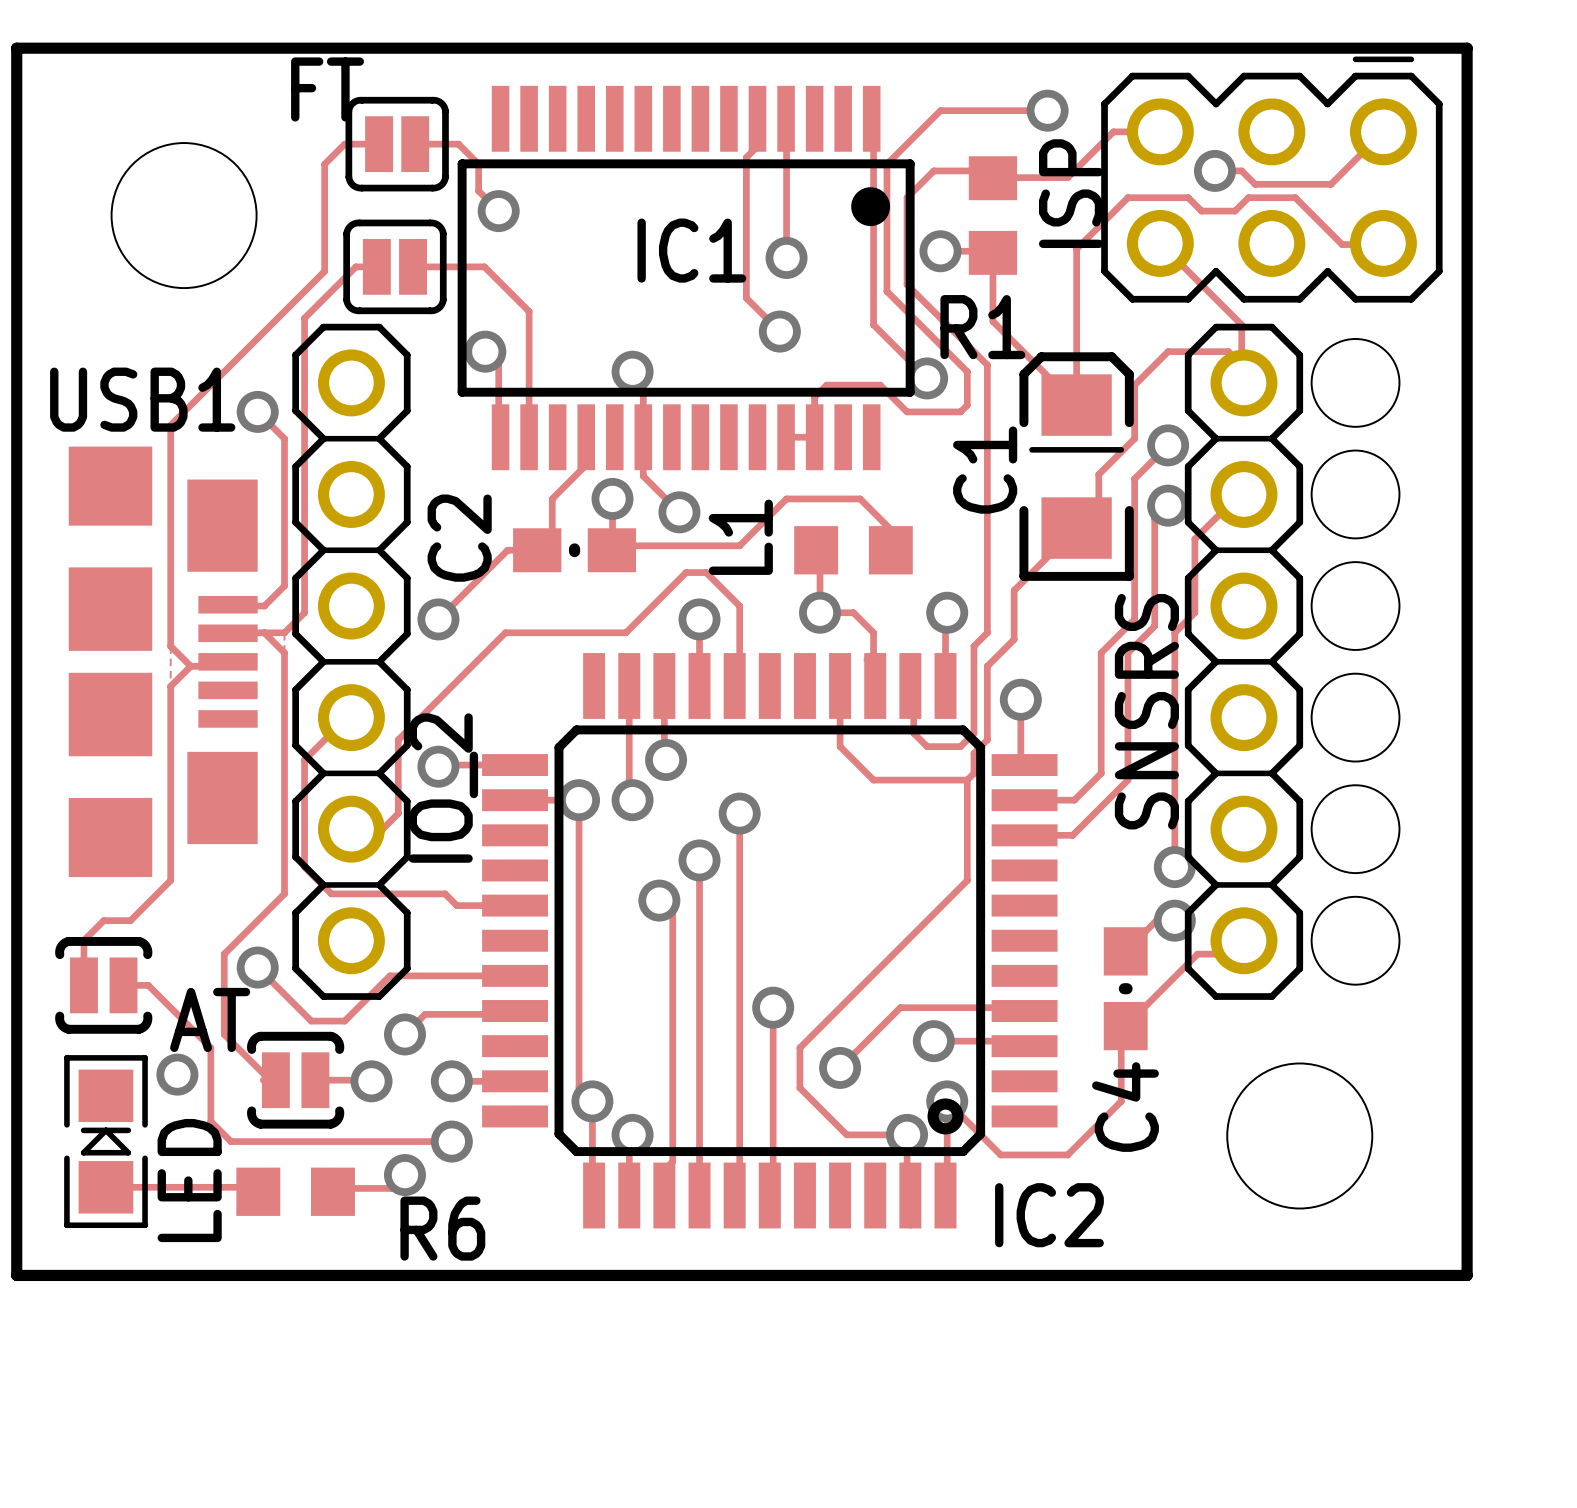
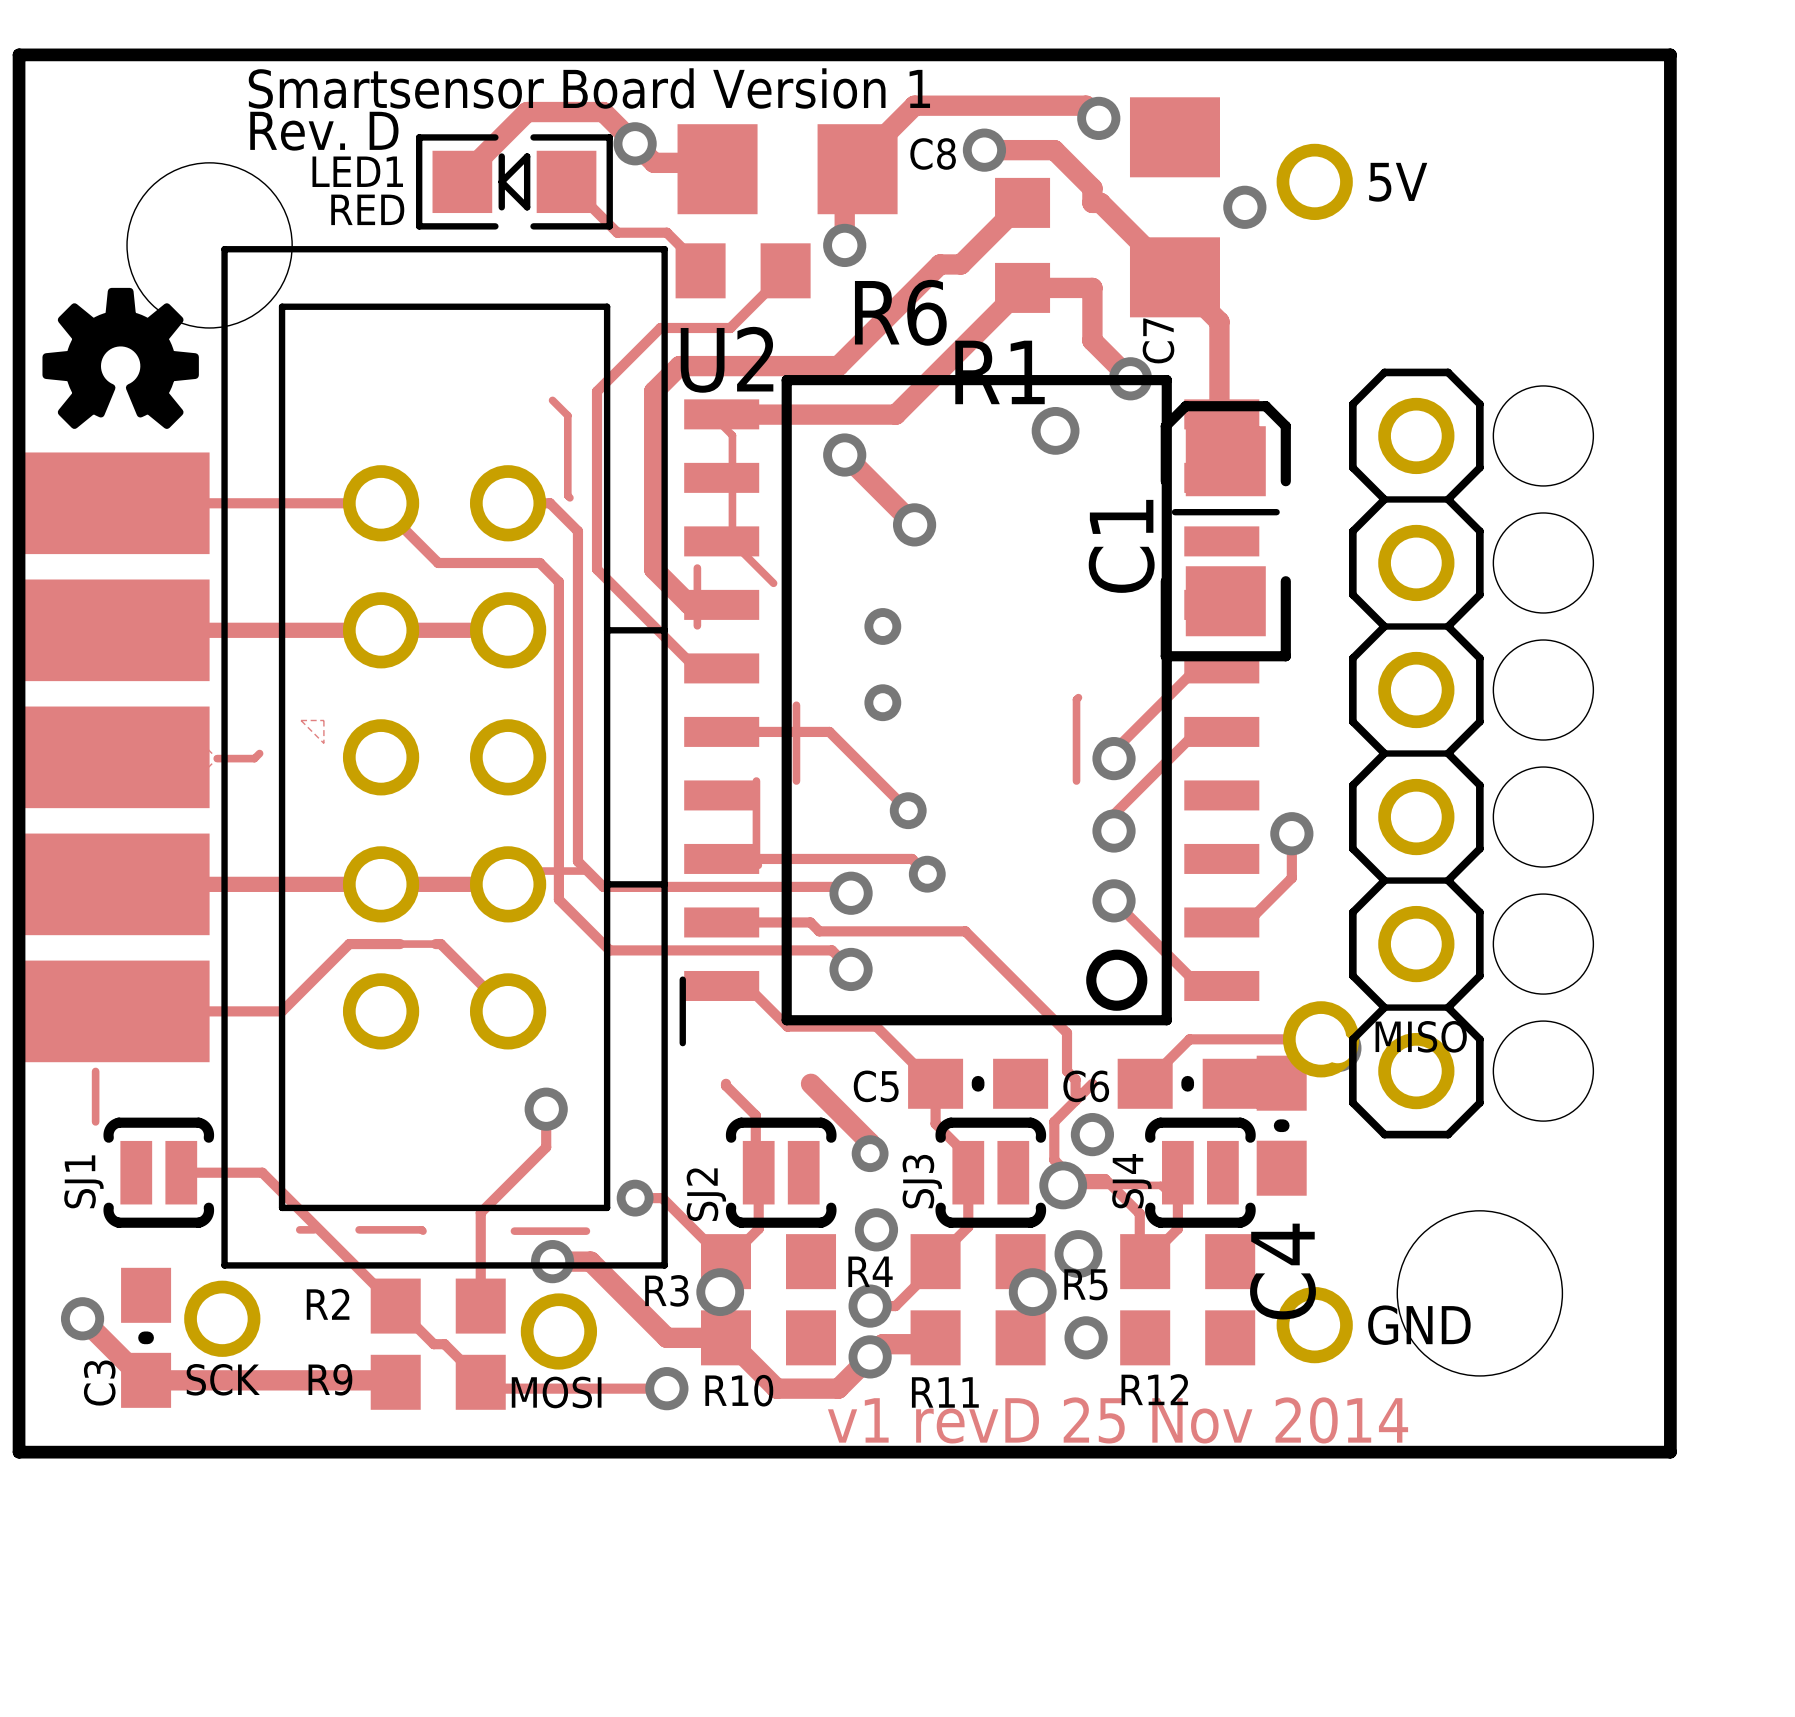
text: none -> Smartsensor Board Version 1 (589, 88)
text: FT (327, 89) -> none
track: none -> (1098, 118) (1086, 105) (914, 105) (857, 162) (857, 169) (844, 182) (844, 245)
via: none -> (1098, 118)
track: (1047, 110) (940, 110) (886, 164) (886, 291) (967, 371) (967, 405) (960, 411) (907, 411) (880, 385) (826, 385) (814, 397) (814, 437) (786, 437) -> none
via: (1047, 110) -> none
text: none -> Rev. D (324, 131)
track: (871, 118) (871, 145) (873, 147) (873, 324) (927, 378) -> none
via: none -> (635, 143)
track: none -> (984, 150) (1054, 150) (1092, 188) (1092, 202) (1100, 202) (1219, 321) (1219, 412) (1221, 414)
via: none -> (984, 150)
track: (1160, 131) (1113, 131) (1067, 177) (993, 177) -> none
track: (1383, 131) (1331, 184) (1255, 184) (1241, 170) (1214, 170) -> none
track: (759, 137) (757, 135) (757, 118) (759, 121) (759, 144) (746, 157) (746, 298) (779, 331) -> none
track: (379, 144) (344, 144) (324, 164) (324, 271) (170, 425) (170, 646) (190, 666) (170, 686) (170, 880) (130, 920) (103, 920) (83, 940) -> none
part: (397, 144) -> none
track: (415, 144) (458, 144) (478, 164) (478, 191) (498, 211) -> none
track: (786, 146) (786, 257) -> none
track: none -> (717, 169) (711, 162) (654, 162) (603, 112) (527, 112) (462, 176) (462, 181)
C8: none -> (787, 169)
LED1: none -> RED (514, 181)
track: none -> (566, 181) (617, 232) (666, 232) (700, 266) (700, 270)
5V: none -> (1314, 181)
via: (1214, 170) -> none
track: none -> (1022, 202) (960, 264) (939, 264) (838, 366) (679, 366) (654, 391) (654, 569) (689, 604) (697, 604)
track: (1008, 178) (992, 178) (985, 170) (933, 170) (907, 197) (907, 284) (987, 365) (987, 632) (973, 646) (973, 733) (960, 746) (927, 746) (913, 733) (913, 689) (910, 685) -> none
ISP: (1271, 179) -> none
C7: none -> (1174, 207)
via: none -> (1244, 207)
via: (498, 211) -> none
via: none -> (844, 245)
R1 position: (992, 215) -> (1022, 245)
track: none -> (785, 270) (730, 327) (660, 327) (597, 391) (597, 569) (692, 664) (717, 664) (721, 668)
track: (1160, 243) (1241, 324) (1241, 380) (1243, 382) (1243, 367) (1228, 351) (1168, 351) (1134, 385) (1134, 438) (1098, 474) (1098, 528) (1076, 528) (1014, 590) (1014, 639) (987, 666) (987, 739) (973, 753) (973, 773) (967, 780) -> none
track: (1383, 243) (1342, 244) (1295, 197) (1248, 197) (1235, 211) (1201, 211) (1188, 197) (1127, 197) (1076, 249) (1076, 405) (992, 321) (992, 252) (991, 251) (940, 251) -> none
via: (940, 251) -> none
drawing: none -> [42, 287, 199, 429]
via: (786, 257) -> none
part: (394, 266) -> none
track: (413, 266) (484, 266) (529, 311) (529, 437) -> none
track: (372, 271) (376, 266) (355, 266) (304, 318) (304, 612) (284, 632) (228, 632) -> none
IC1: (686, 278) -> none
via: (779, 331) -> none
track: none -> (1130, 378) (1092, 340) (1092, 287) (1022, 287) (895, 414) (721, 414)
via: none -> (1130, 378)
via: (485, 351) -> none
via: (632, 371) -> none
track: none -> (844, 455) (914, 524)
via: none -> (844, 455)
track: (257, 411) (284, 438) (284, 585) (264, 606) (228, 604) -> none
via: (257, 411) -> none
track: (585, 437) (585, 465) (552, 498) (552, 535) (537, 550) (507, 550) (438, 619) -> none
track: none -> (114, 503) (381, 503) (381, 505) (438, 562) (539, 562) (558, 582) (558, 899) (609, 950) (832, 950) (851, 969)
track: none -> (508, 503) (550, 503) (577, 531) (577, 861) (603, 886) (844, 886) (851, 893)
track: (1168, 445) (1134, 478) (1134, 619) (1101, 652) (1101, 773) (1074, 800) (1024, 800) -> none
via: (1168, 445) -> none
via: none -> (914, 524)
track: (1243, 494) (1239, 494) (1194, 539) (1194, 612) (1174, 632) (1174, 867) -> none
via: (612, 498) -> none
track: (1168, 505) (1154, 519) (1154, 626) (1127, 652) (1127, 780) (1072, 835) (1024, 835) -> none
via: (1168, 505) -> none
via: (679, 512) -> none
C2: (574, 550) -> none
track: (611, 550) (616, 545) (739, 545) (786, 498) (860, 498) (890, 529) (890, 550) -> none
via: none -> (882, 626)
track: (816, 550) (820, 554) (820, 612) (853, 612) (873, 632) (873, 659) -> none
L1: (853, 550) -> none
track: none -> (114, 630) (508, 630)
track: none -> (1221, 668) (1219, 670) (1194, 670) (1114, 750) (1114, 758)
via: (820, 612) -> none
via: (947, 612) -> none
U2: none -> (971, 700)
via: none -> (882, 702)
via: (438, 619) -> none
via: (699, 619) -> none
track: (264, 632) (284, 652) (284, 893) (224, 954) (224, 1034) (269, 1080) -> none
track: none -> (721, 731) (829, 731) (908, 810)
track: none -> (1221, 731) (1219, 734) (1194, 734) (1114, 814) (1114, 831)
USB1: (163, 661) -> none
IO_2: (351, 661) -> none
part: none -> (114, 757)
part: none -> (453, 757)
via: none -> (1114, 758)
track: (629, 685) (629, 796) (632, 800) -> none
track: (734, 685) (739, 680) (739, 606) (706, 572) (686, 572) (625, 632) (505, 632) (398, 739) (398, 813) (382, 829) -> (508, 1011) (440, 944) (435, 944)
track: (840, 685) (840, 746) (873, 780) (967, 780) -> none
track: (1020, 699) (1020, 761) (1024, 765) -> none
via: (1020, 699) -> none
text: SNSRS (1146, 711) -> none
via: none -> (908, 810)
track: (351, 717) (346, 717) (304, 760) (304, 867) (331, 893) (445, 893) (456, 905) (515, 905) -> none
via: none -> (1114, 831)
track: none -> (1291, 833) (1291, 878) (1255, 914) (1248, 914) (1248, 922) (1221, 922)
via: none -> (1291, 833)
track: none -> (721, 858) (912, 858) (927, 874)
via: (666, 760) -> none
via: (438, 766) -> none
via: none -> (927, 874)
track: none -> (114, 884) (508, 884)
track: (967, 780) (967, 880) (799, 1047) (799, 1088) (846, 1134) (907, 1134) (907, 1192) (910, 1195) (910, 1225) -> none
via: none -> (851, 893)
track: none -> (1114, 900) (1199, 985) (1221, 985)
via: none -> (1114, 900)
track: (515, 800) (579, 800) (579, 1088) (592, 1101) (592, 1193) (594, 1195) -> none
via: (579, 800) -> none
via: (632, 800) -> none
track: none -> (701, 922) (810, 922) (819, 931) (965, 931) (1067, 1032) (1067, 1071) (1075, 1079) (1075, 1100)
track: (739, 813) (739, 1190) (734, 1195) -> none
via: (739, 813) -> none
track: none -> (400, 944) (349, 944) (281, 1011) (114, 1011)
via: none -> (851, 969)
track: none -> (715, 979) (724, 988) (749, 988) (787, 1026) (876, 1026) (935, 1083) (935, 1123) (959, 1147) (959, 1163) (968, 1172) (968, 1226) (935, 1261) (935, 1266) (895, 1306) (870, 1306)
track: (699, 860) (699, 1195) -> none
via: (699, 860) -> none
via: (1174, 867) -> none
track: (659, 900) (672, 913) (672, 1161) (659, 1175) (659, 1190) (664, 1195) -> none
via: (659, 900) -> none
track: none -> (1321, 1039) (1189, 1039) (1145, 1083)
MISO: none -> (1321, 1039)
IC2: (769, 940) -> none
track: (1243, 940) (1230, 954) (1197, 954) (1121, 1030) (1121, 1101) (1067, 1154) (1000, 1154) (947, 1101) (947, 1193) (945, 1195) -> none
track: none -> (725, 1083) (755, 1115) (755, 1169) (758, 1172) (758, 1228) (725, 1261)
track: none -> (811, 1083) (870, 1142) (870, 1153)
C5: none -> (978, 1083)
track: none -> (1092, 1083) (1054, 1121) (1054, 1160) (1073, 1179) (1105, 1179) (1139, 1213) (1139, 1247) (1145, 1253) (1145, 1261) (1177, 1228) (1177, 1172)
C6: none -> (1187, 1083)
track: (257, 967) (311, 1021) (344, 1021) (389, 975) (515, 975) -> none
via: (257, 967) -> none
track: none -> (546, 1109) (546, 1147) (480, 1212) (480, 1306)
via: none -> (546, 1109)
part: (103, 985) -> none
track: (123, 985) (148, 985) (210, 1047) (210, 1121) (230, 1141) (451, 1141) -> none
via size: [752, 986, 795, 1029] -> [851, 1135, 889, 1173]
via: none -> (1092, 1134)
track: (773, 1007) (773, 1192) (769, 1195) -> none
track: (515, 1011) (511, 1014) (425, 1014) (404, 1034) -> none
track: (1024, 1011) (1021, 1007) (900, 1007) (840, 1067) -> none
text: AT (210, 1019) -> none
SJ1: none -> (158, 1172)
track: none -> (181, 1172) (262, 1172) (433, 1344) (444, 1344) (487, 1388) (666, 1388)
SJ2: none -> (781, 1172)
SJ3: none -> (990, 1172)
SJ4: none -> (1200, 1172)
via: (404, 1034) -> none
track: none -> (635, 1198) (662, 1198) (725, 1261)
via: none -> (635, 1198)
via: (840, 1067) -> none
via: (177, 1074) -> none
part: (295, 1080) -> none
via: none -> (876, 1229)
via: (371, 1081) -> none
via: (451, 1081) -> none
via: (592, 1101) -> none
track: none -> (552, 1261) (590, 1261) (666, 1337) (725, 1337) (776, 1388) (838, 1388) (882, 1344) (927, 1344) (935, 1337)
via: none -> (552, 1261)
R3: none -> (768, 1261)
R4: none -> (978, 1261)
R5: none -> (1187, 1261)
part: (105, 1141) -> none
via: (451, 1141) -> none
R2: none -> (438, 1306)
via: none -> (870, 1306)
track: none -> (82, 1318) (144, 1380) (393, 1380) (395, 1382)
via: none -> (82, 1318)
SCK: none -> (222, 1318)
GND: none -> (1314, 1325)
MOSI: none -> (558, 1331)
C3: none -> (146, 1337)
track: (404, 1175) (391, 1188) (351, 1188) (348, 1191) (332, 1191) -> none
via: (404, 1175) -> none
R10: none -> (768, 1337)
R11: none -> (978, 1337)
via: none -> (1086, 1337)
R12: none -> (1187, 1337)
text: LED (189, 1180) -> none
track: (105, 1187) (253, 1187) (258, 1191) -> none
R6 position: (295, 1191) -> (743, 270)
via: none -> (870, 1356)
R9: none -> (438, 1382)
via: none -> (666, 1388)
text: none -> v1 revD 25 Nov 2014 (1118, 1420)

